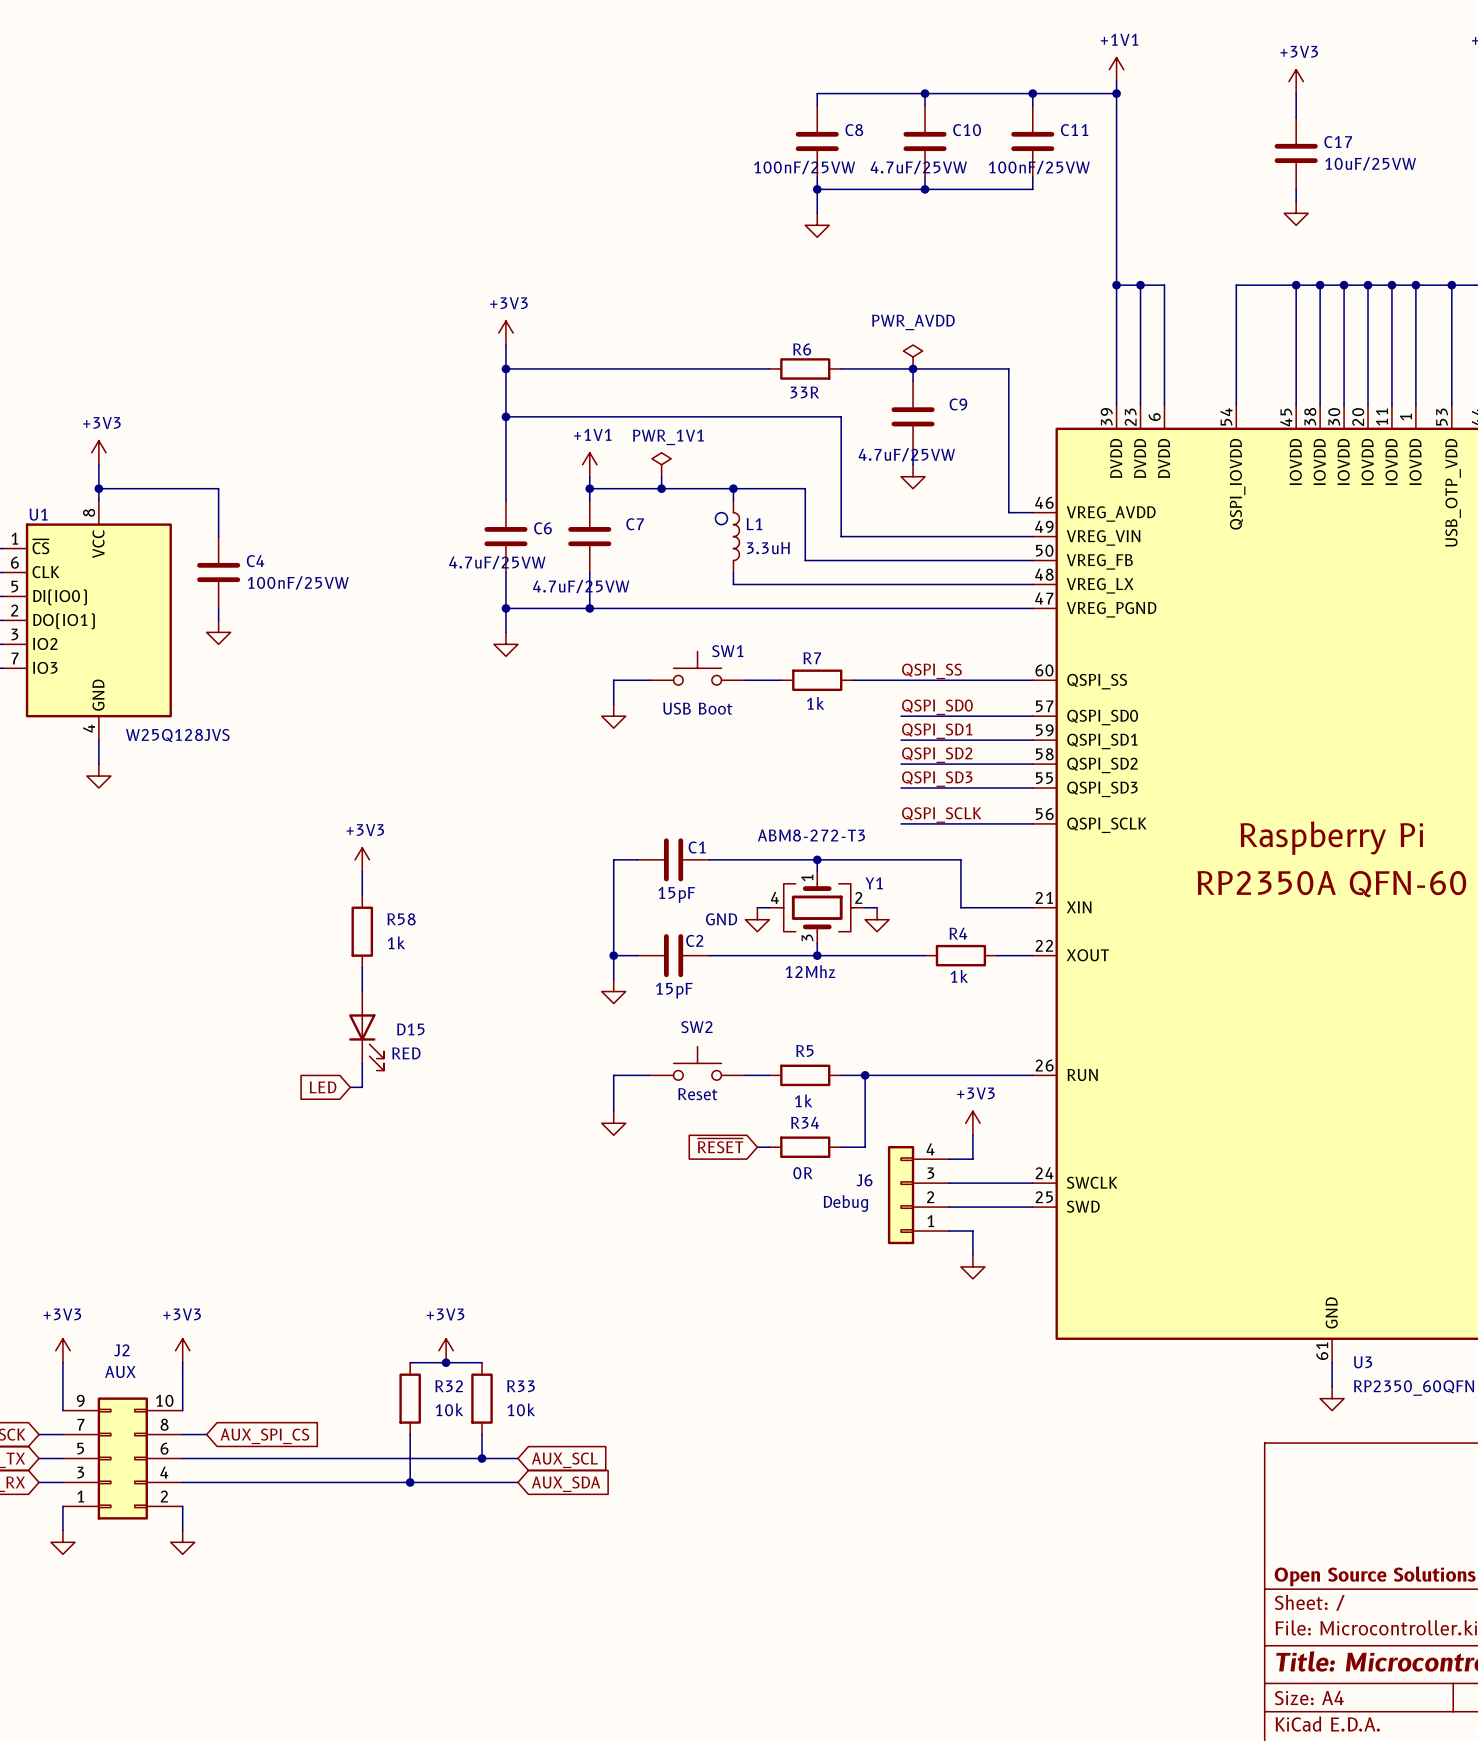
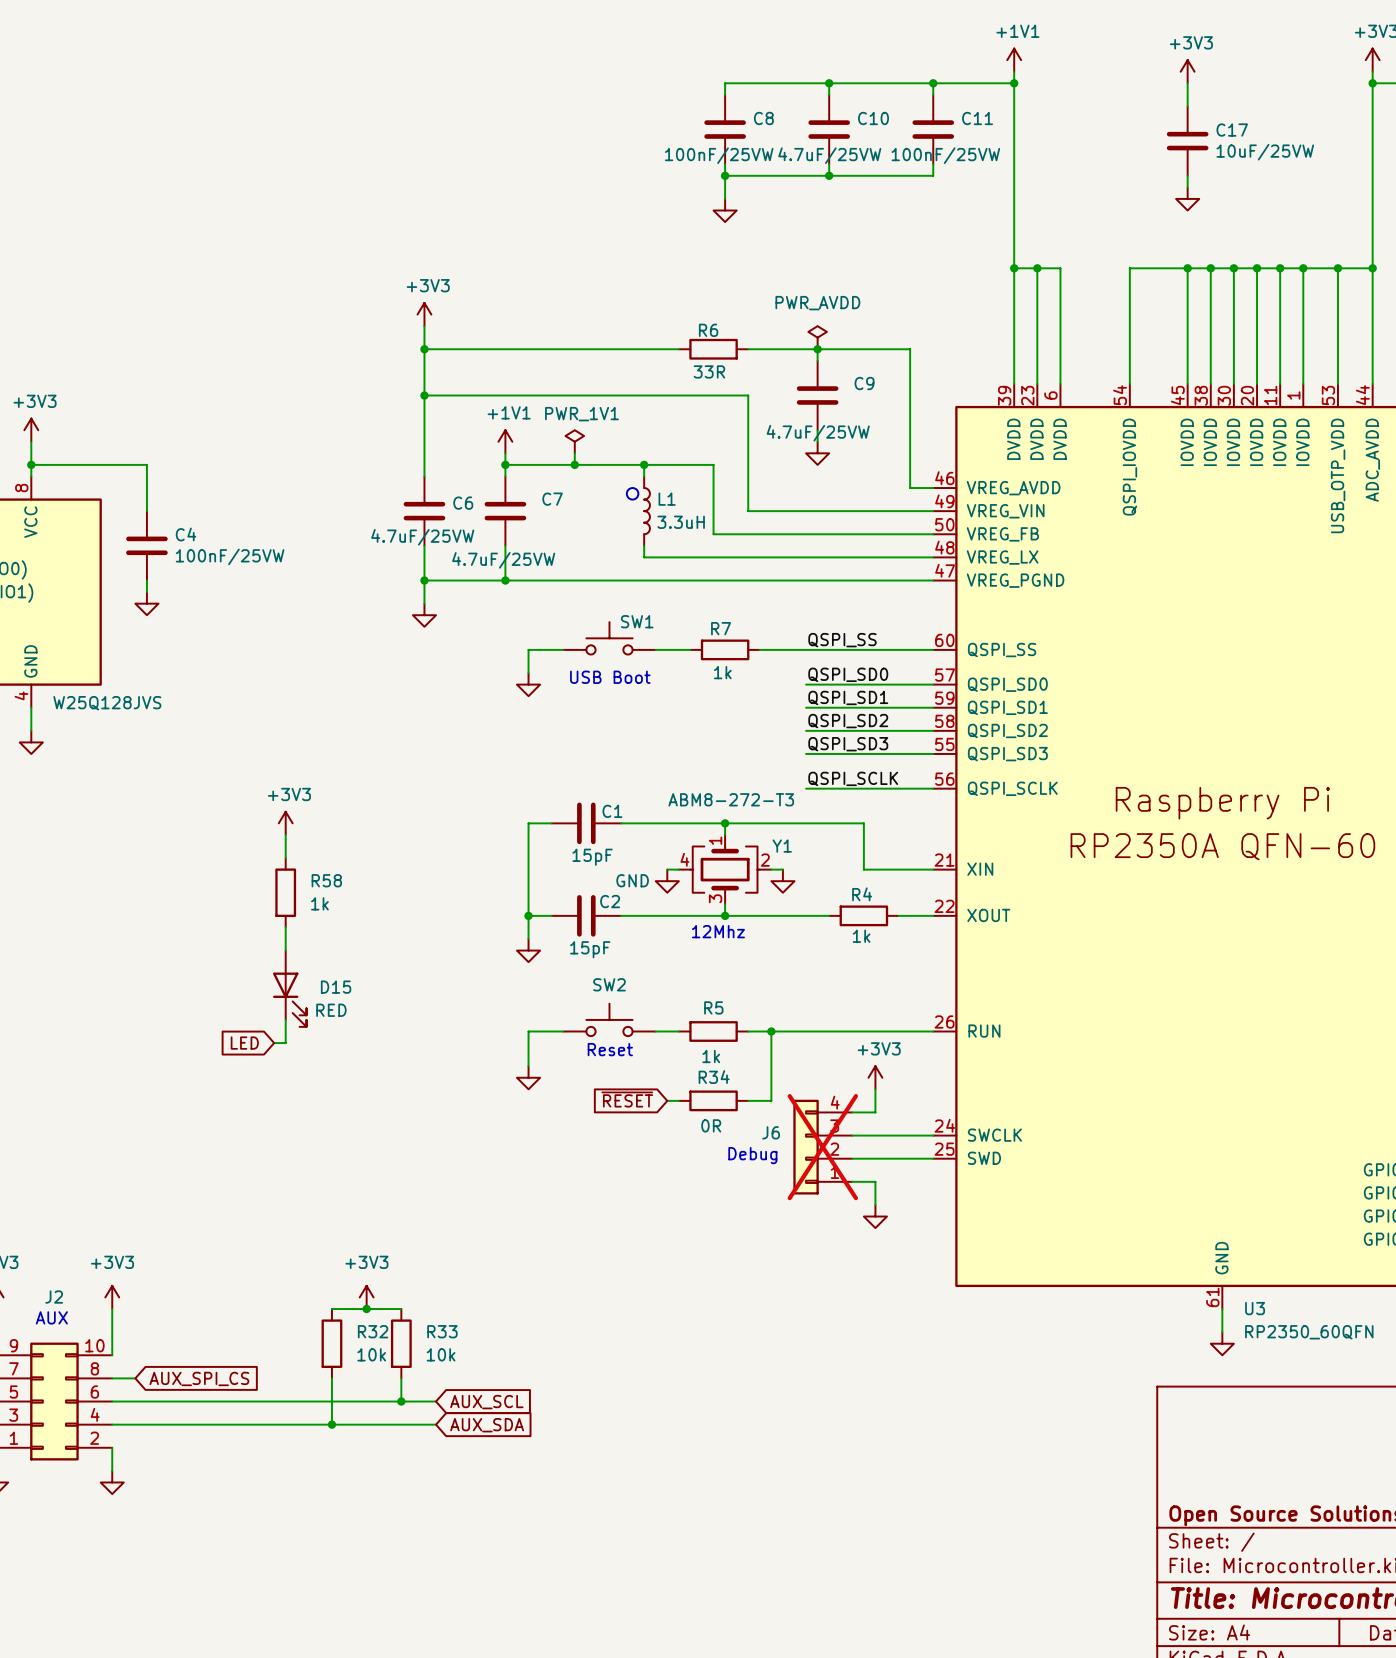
J6 do-not-place cross: none -> (822, 1147)

